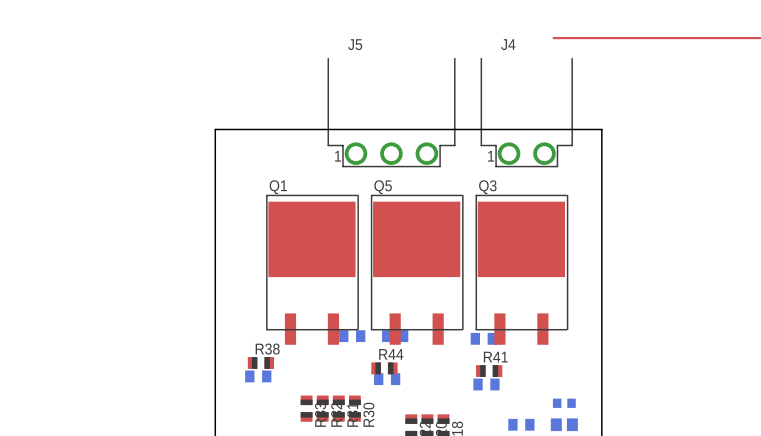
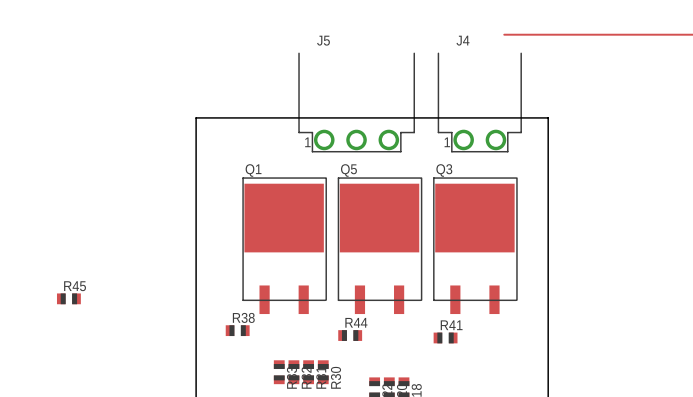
R45: none -> (68, 298)
part: (352, 336) -> none
part: (395, 336) -> none
part: (483, 338) -> none
part: (258, 376) -> none
part: (387, 379) -> none
part: (486, 384) -> none
part: (564, 403) -> none
part: (521, 424) -> none
part: (564, 424) -> none

